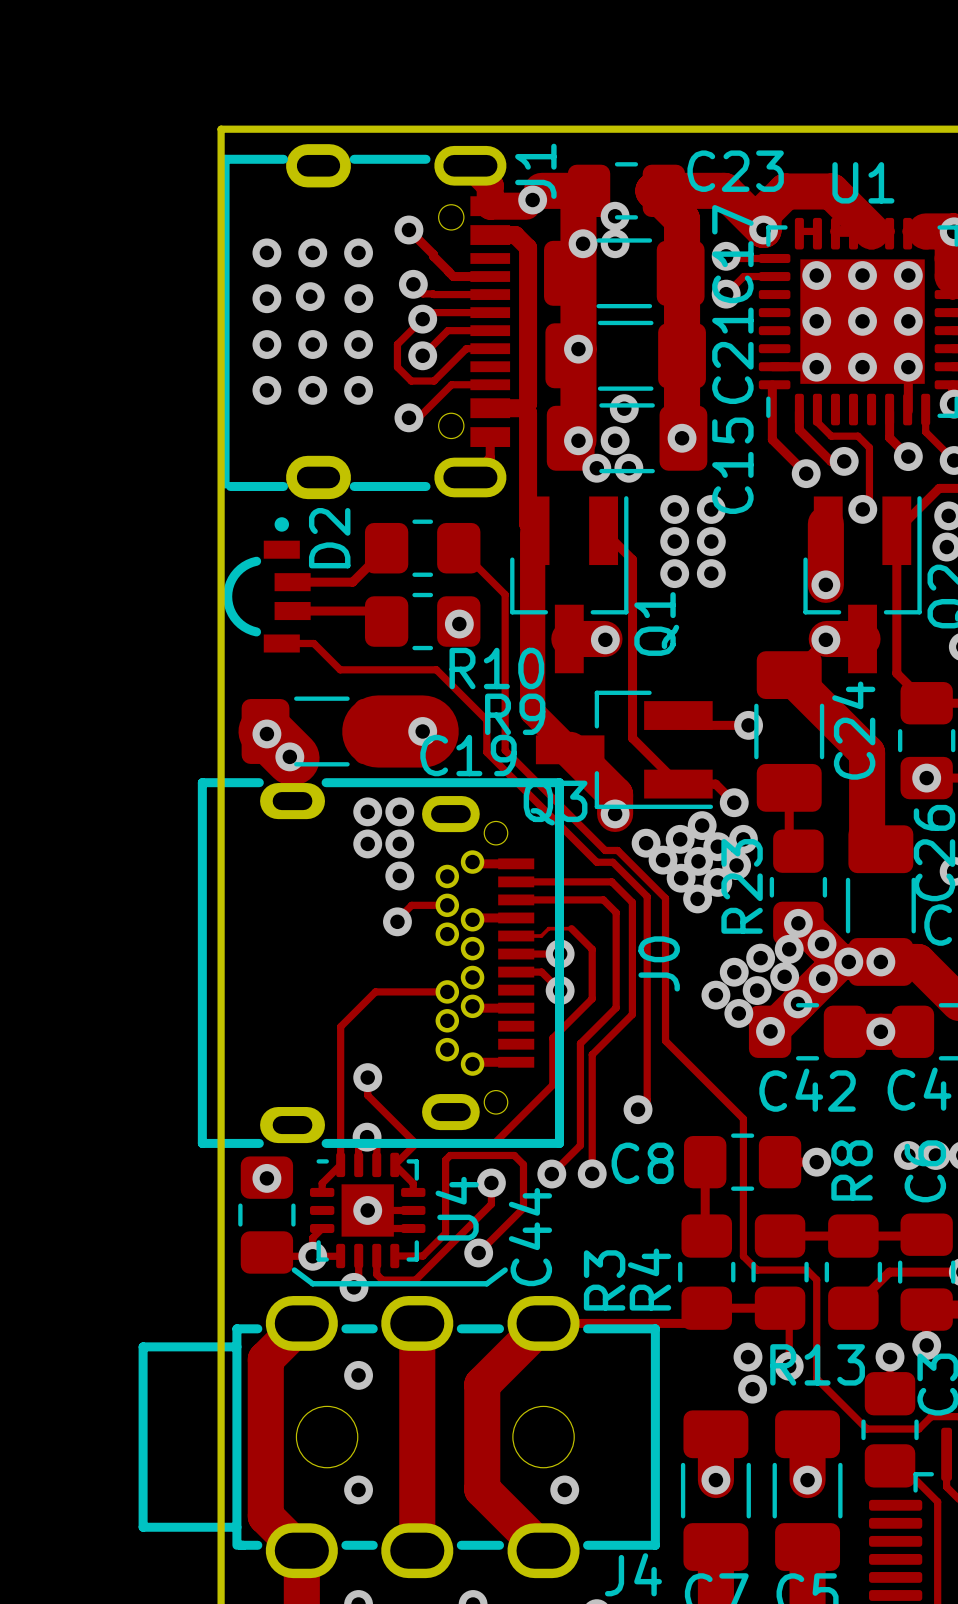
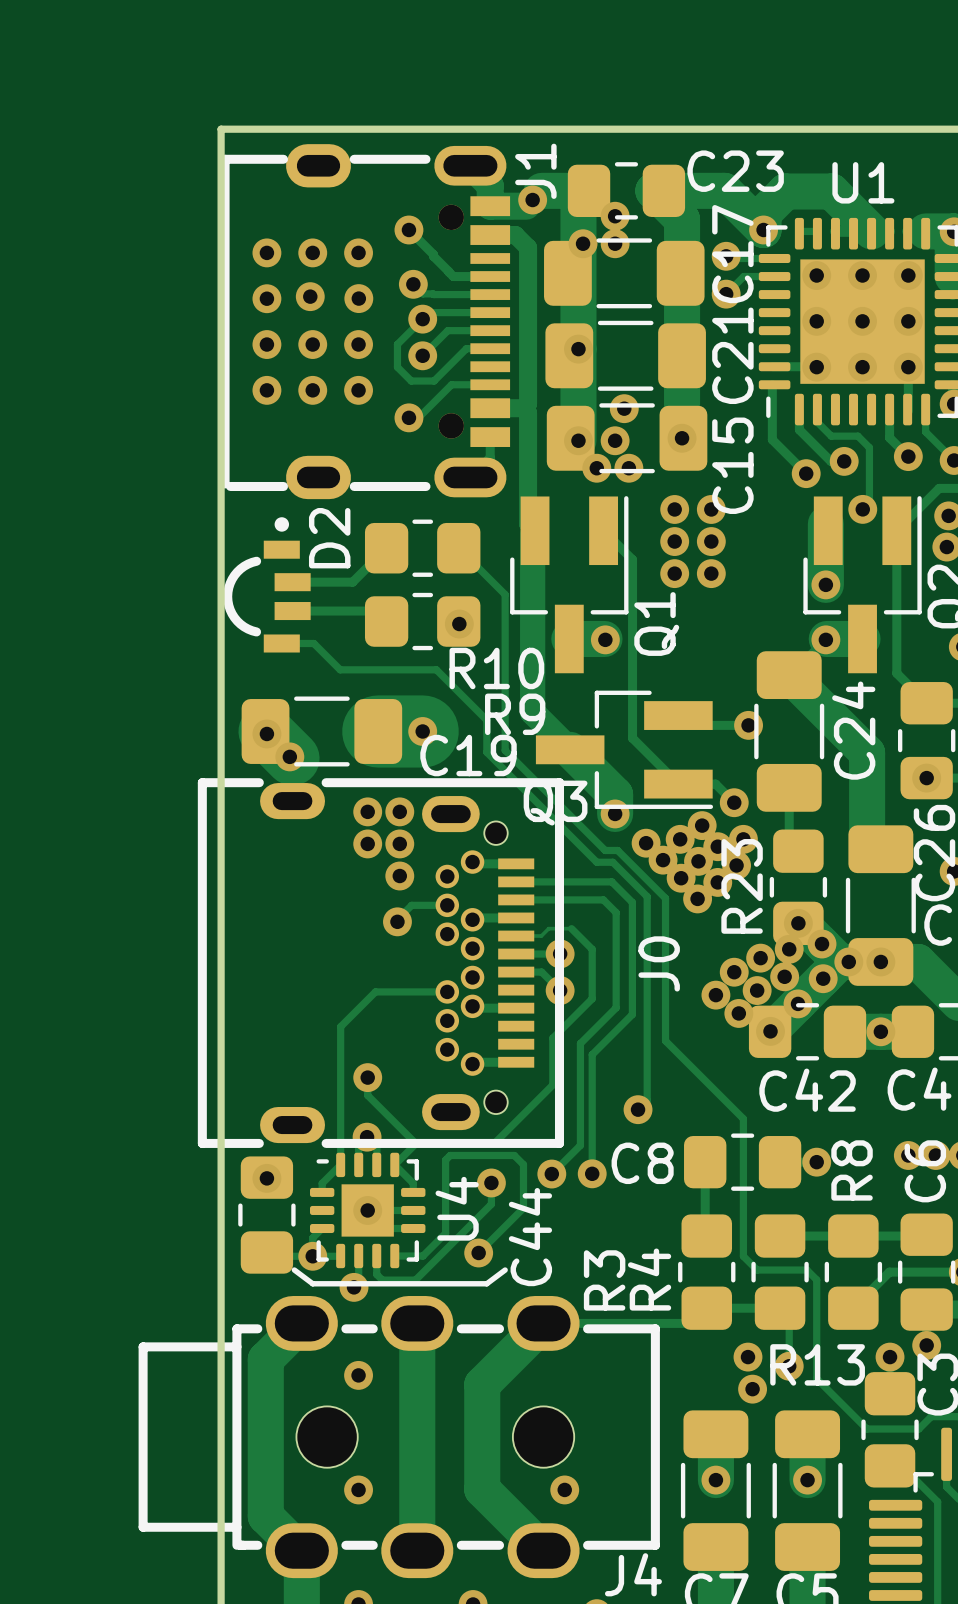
J1 footprint: [220, 144, 511, 500] -> [220, 144, 511, 500]

